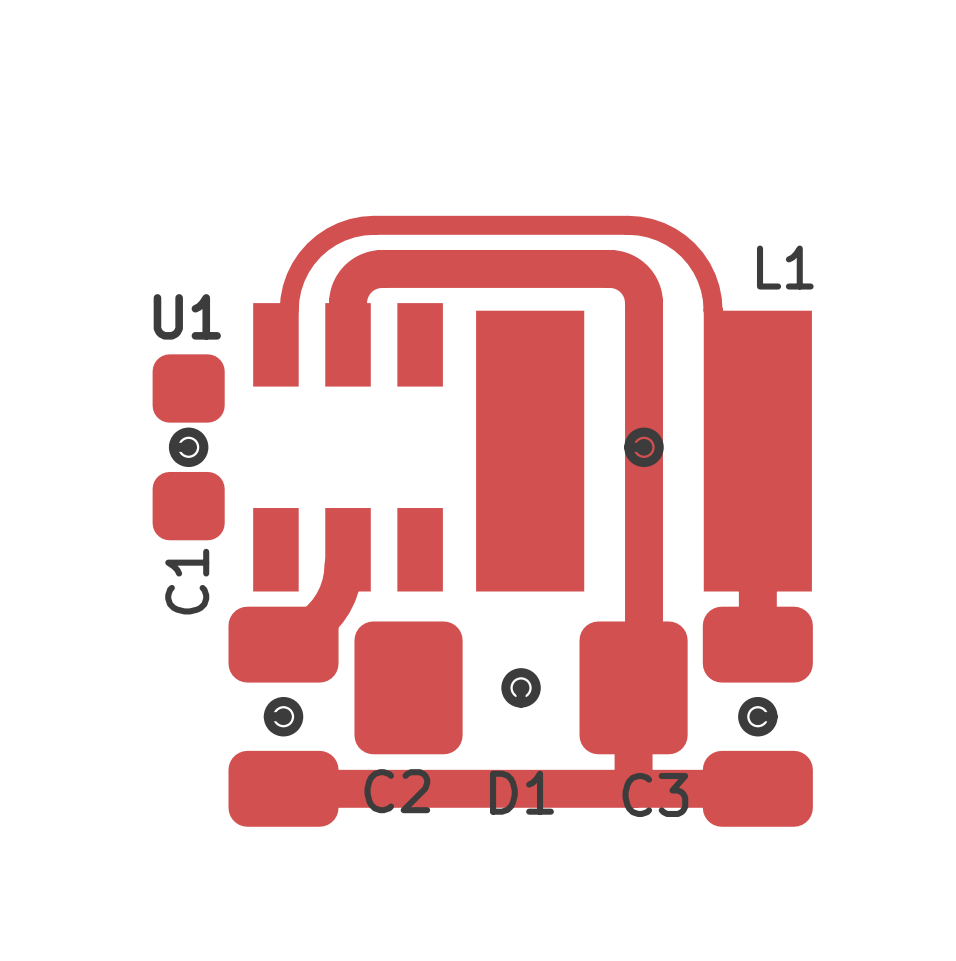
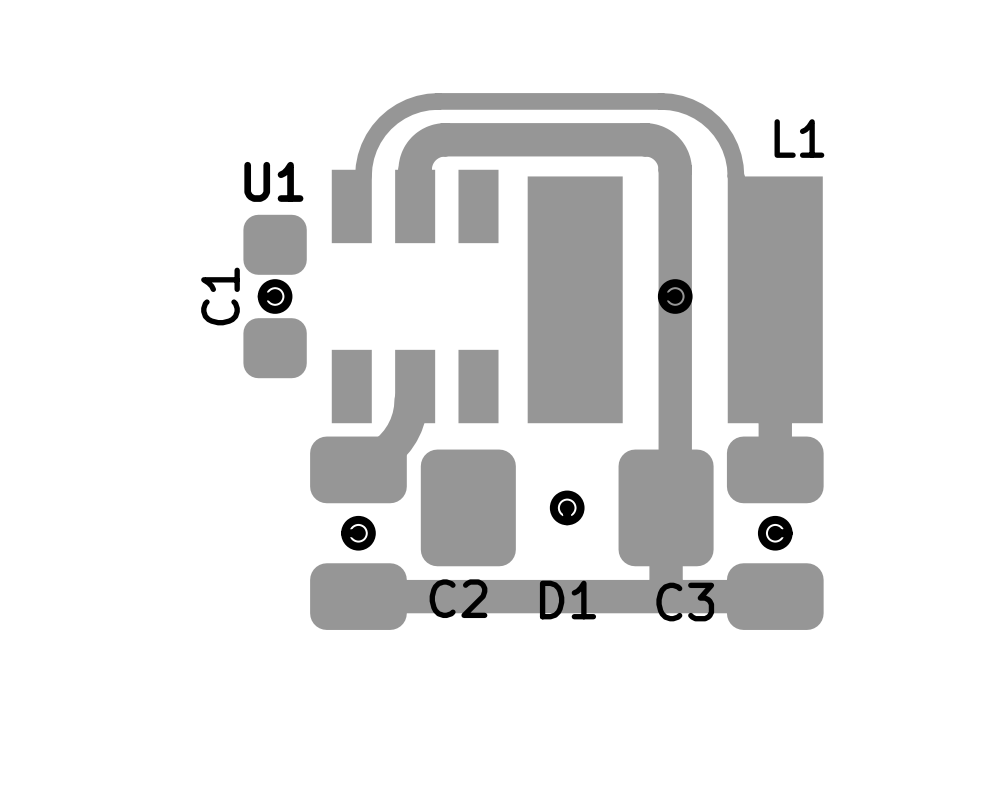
C1 name position: C1 (187, 581) -> C1 (220, 296)

